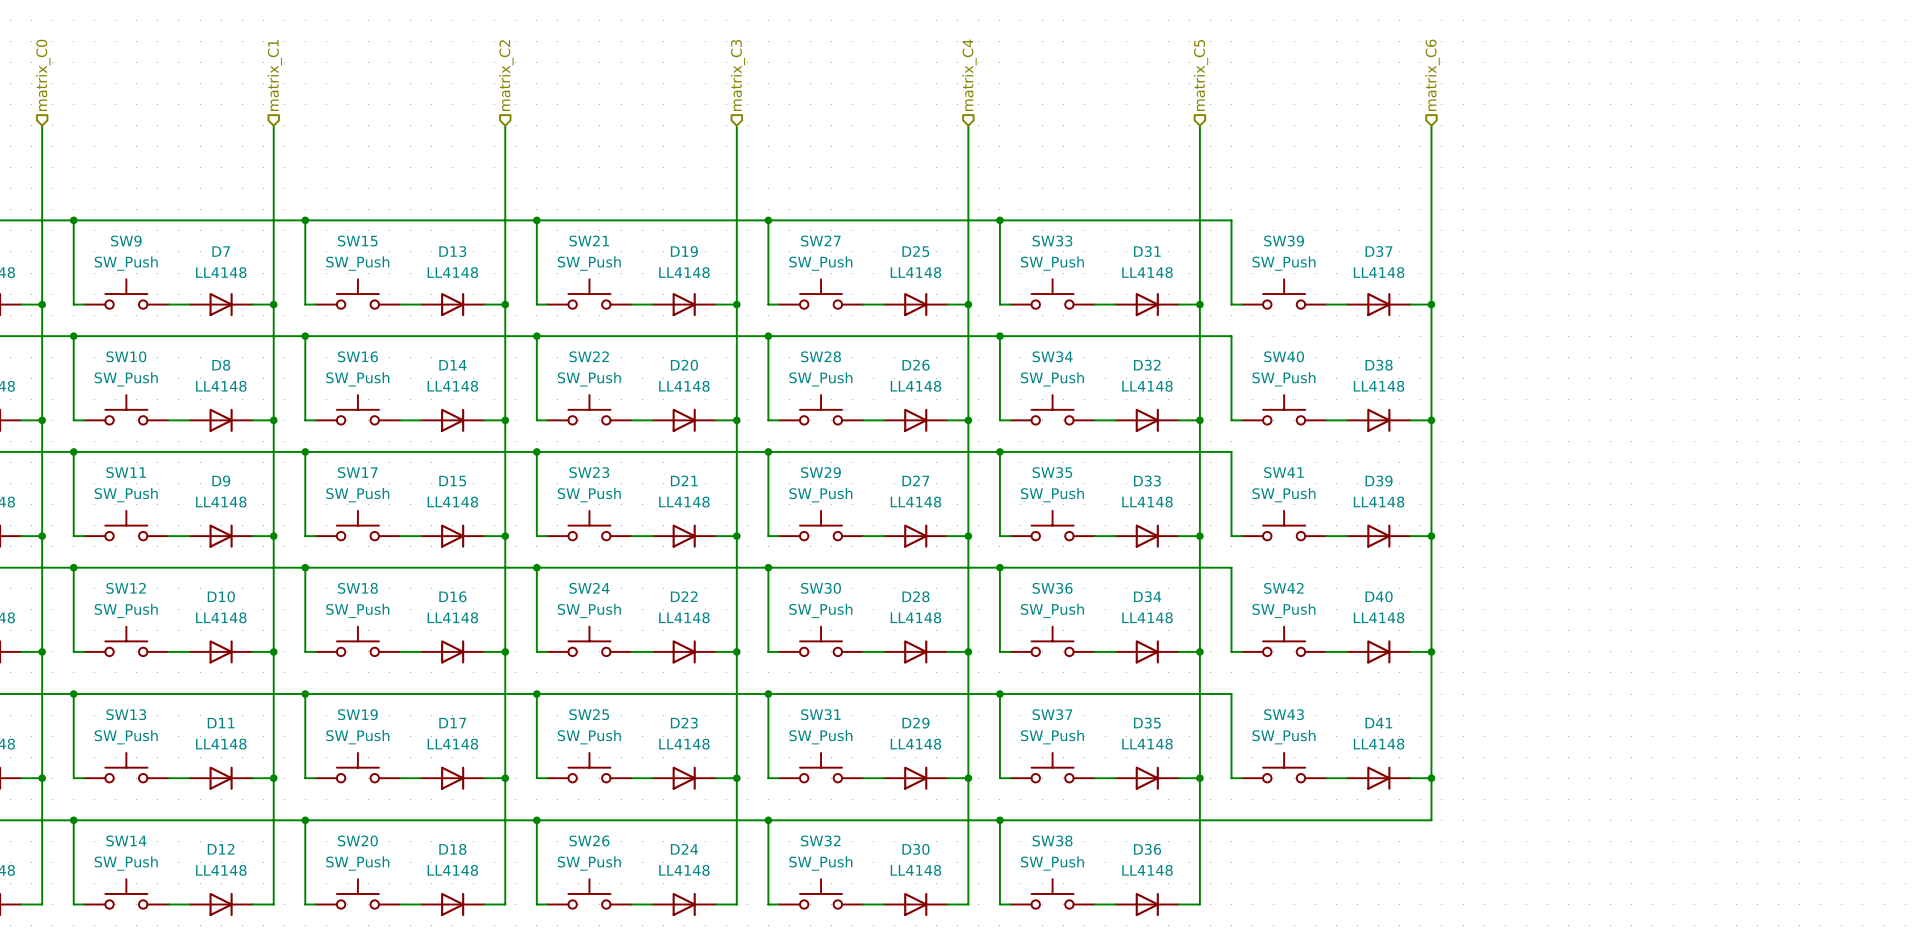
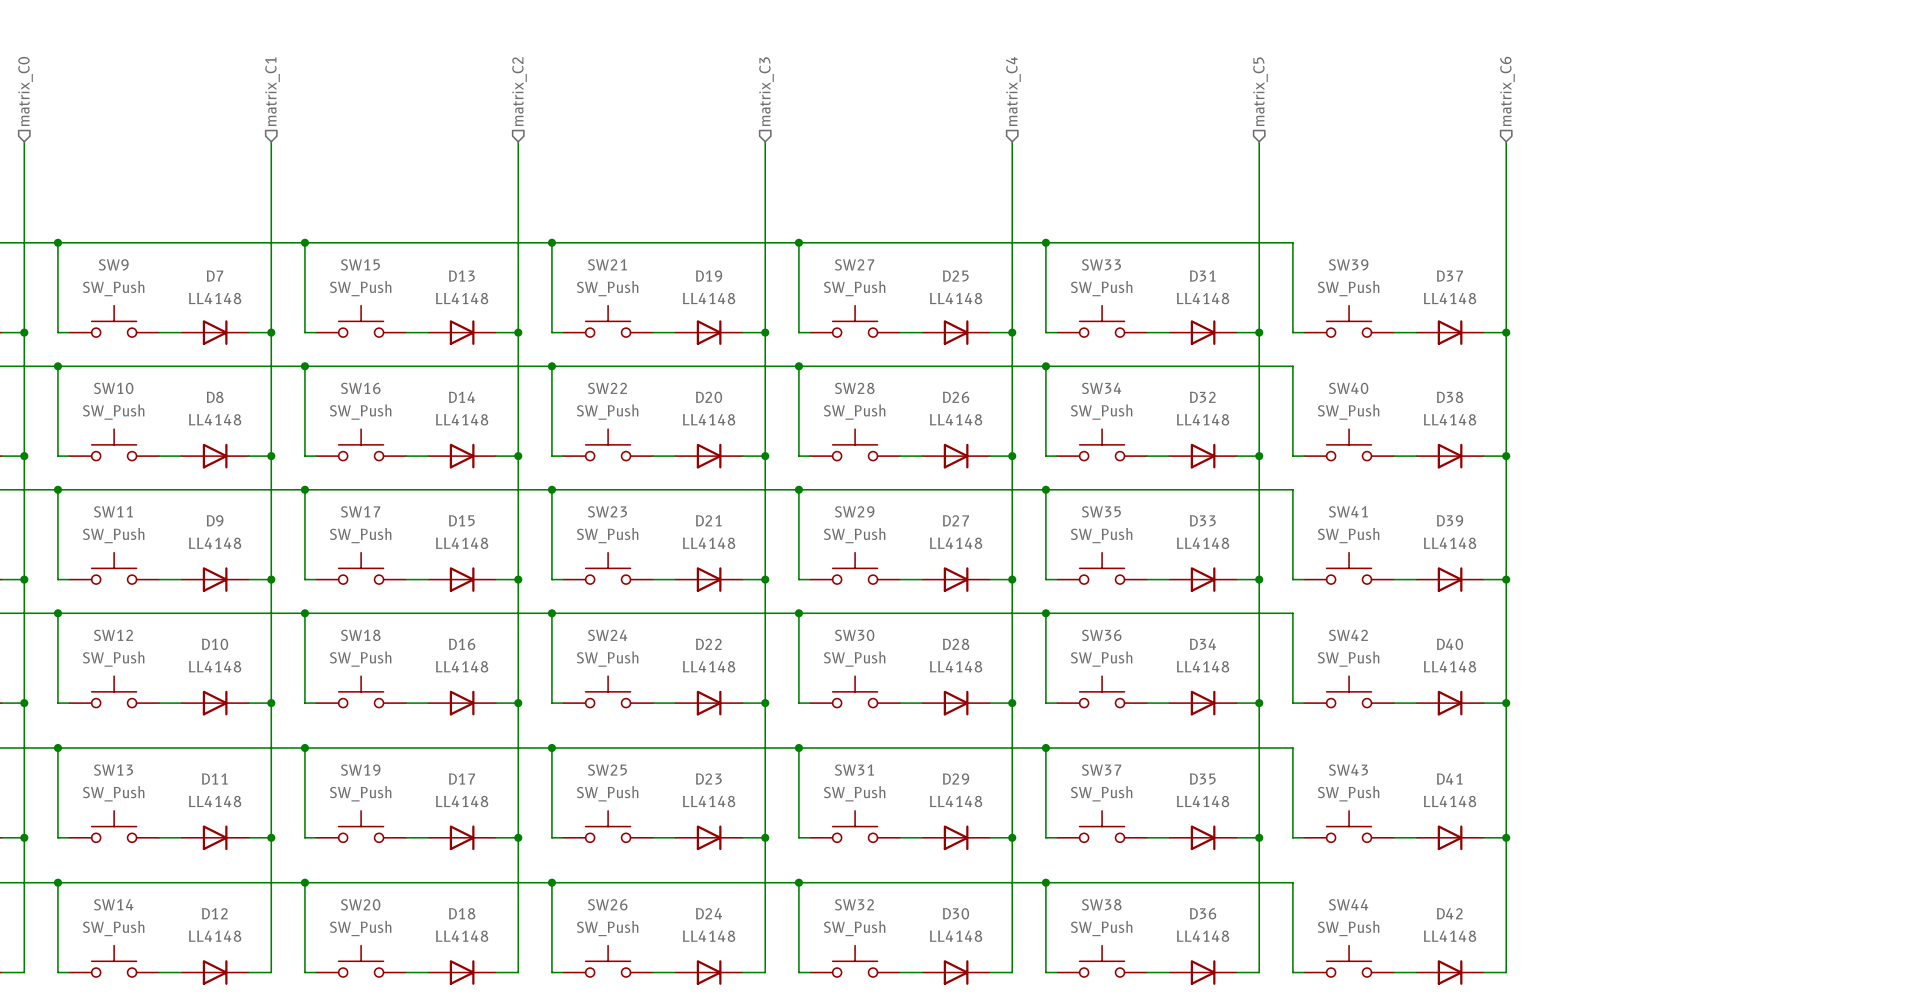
wire: (1231, 820) (1431, 820) -> (1483, 972) (1506, 972) (1506, 882)
wire: none -> (1292, 882) (1292, 972) (1304, 972)
SW44: none -> SW_Push (1349, 961)
wire: none -> (1393, 972) (1416, 972)
D42: none -> LL4148 (1450, 972)

